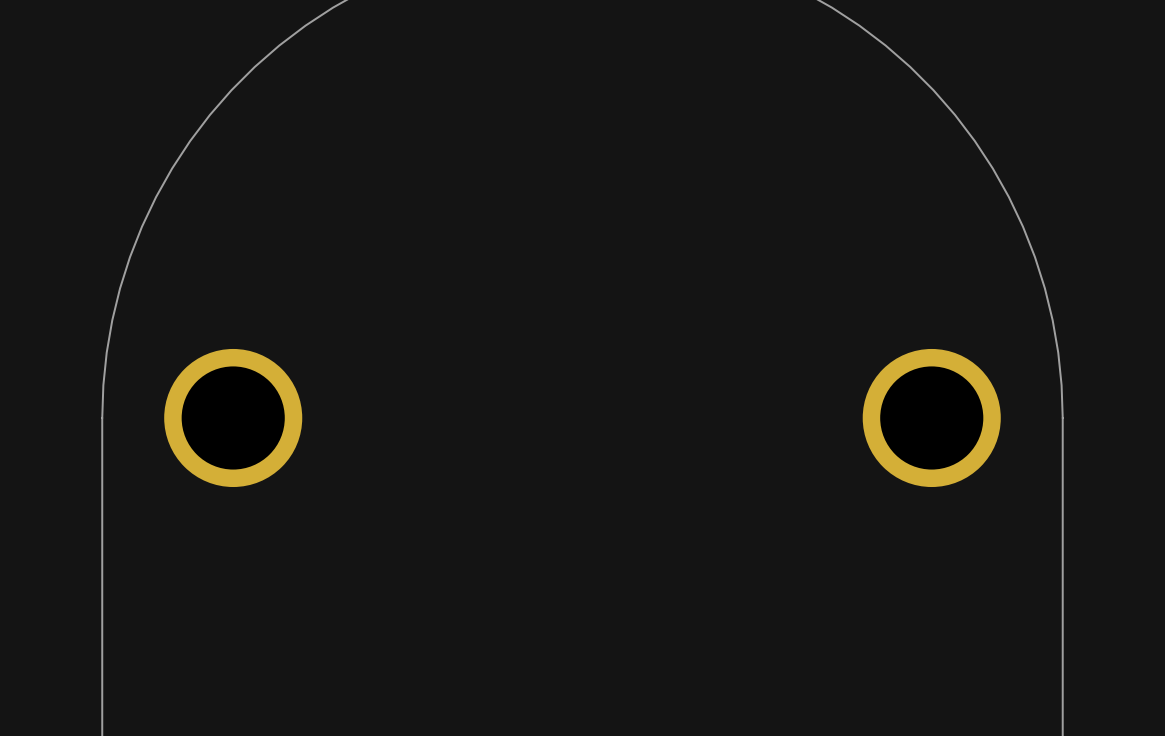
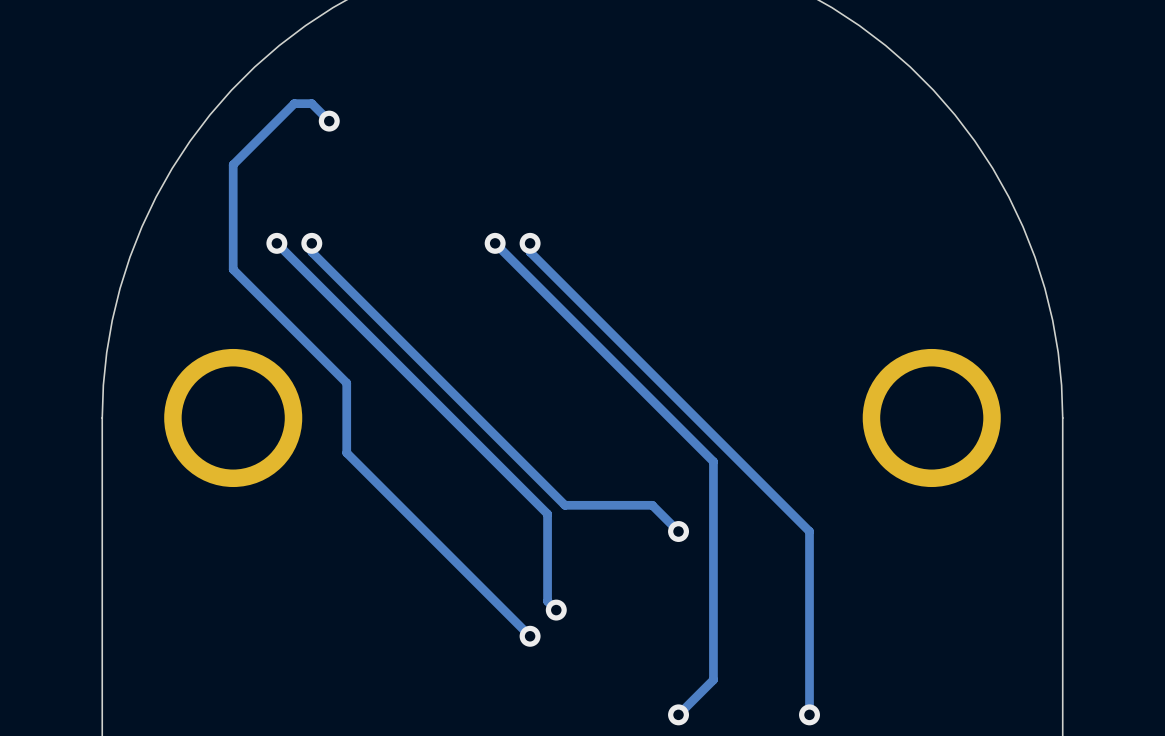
track: none -> (329, 121) (311, 103) (294, 103) (233, 164) (233, 269) (346, 383) (346, 452) (530, 636)
via: none -> (329, 121)
track: none -> (276, 243) (547, 514) (547, 601) (556, 610)
via: none -> (276, 243)
track: none -> (311, 243) (311, 252) (565, 505) (652, 505) (678, 531)
via: none -> (311, 243)
track: none -> (495, 243) (713, 461) (713, 679) (678, 714)
via: none -> (495, 243)
track: none -> (530, 243) (530, 252) (809, 531) (809, 714)
via: none -> (530, 243)
via: none -> (678, 531)
via: none -> (556, 610)
via: none -> (530, 636)
via: none -> (678, 714)
via: none -> (809, 714)

